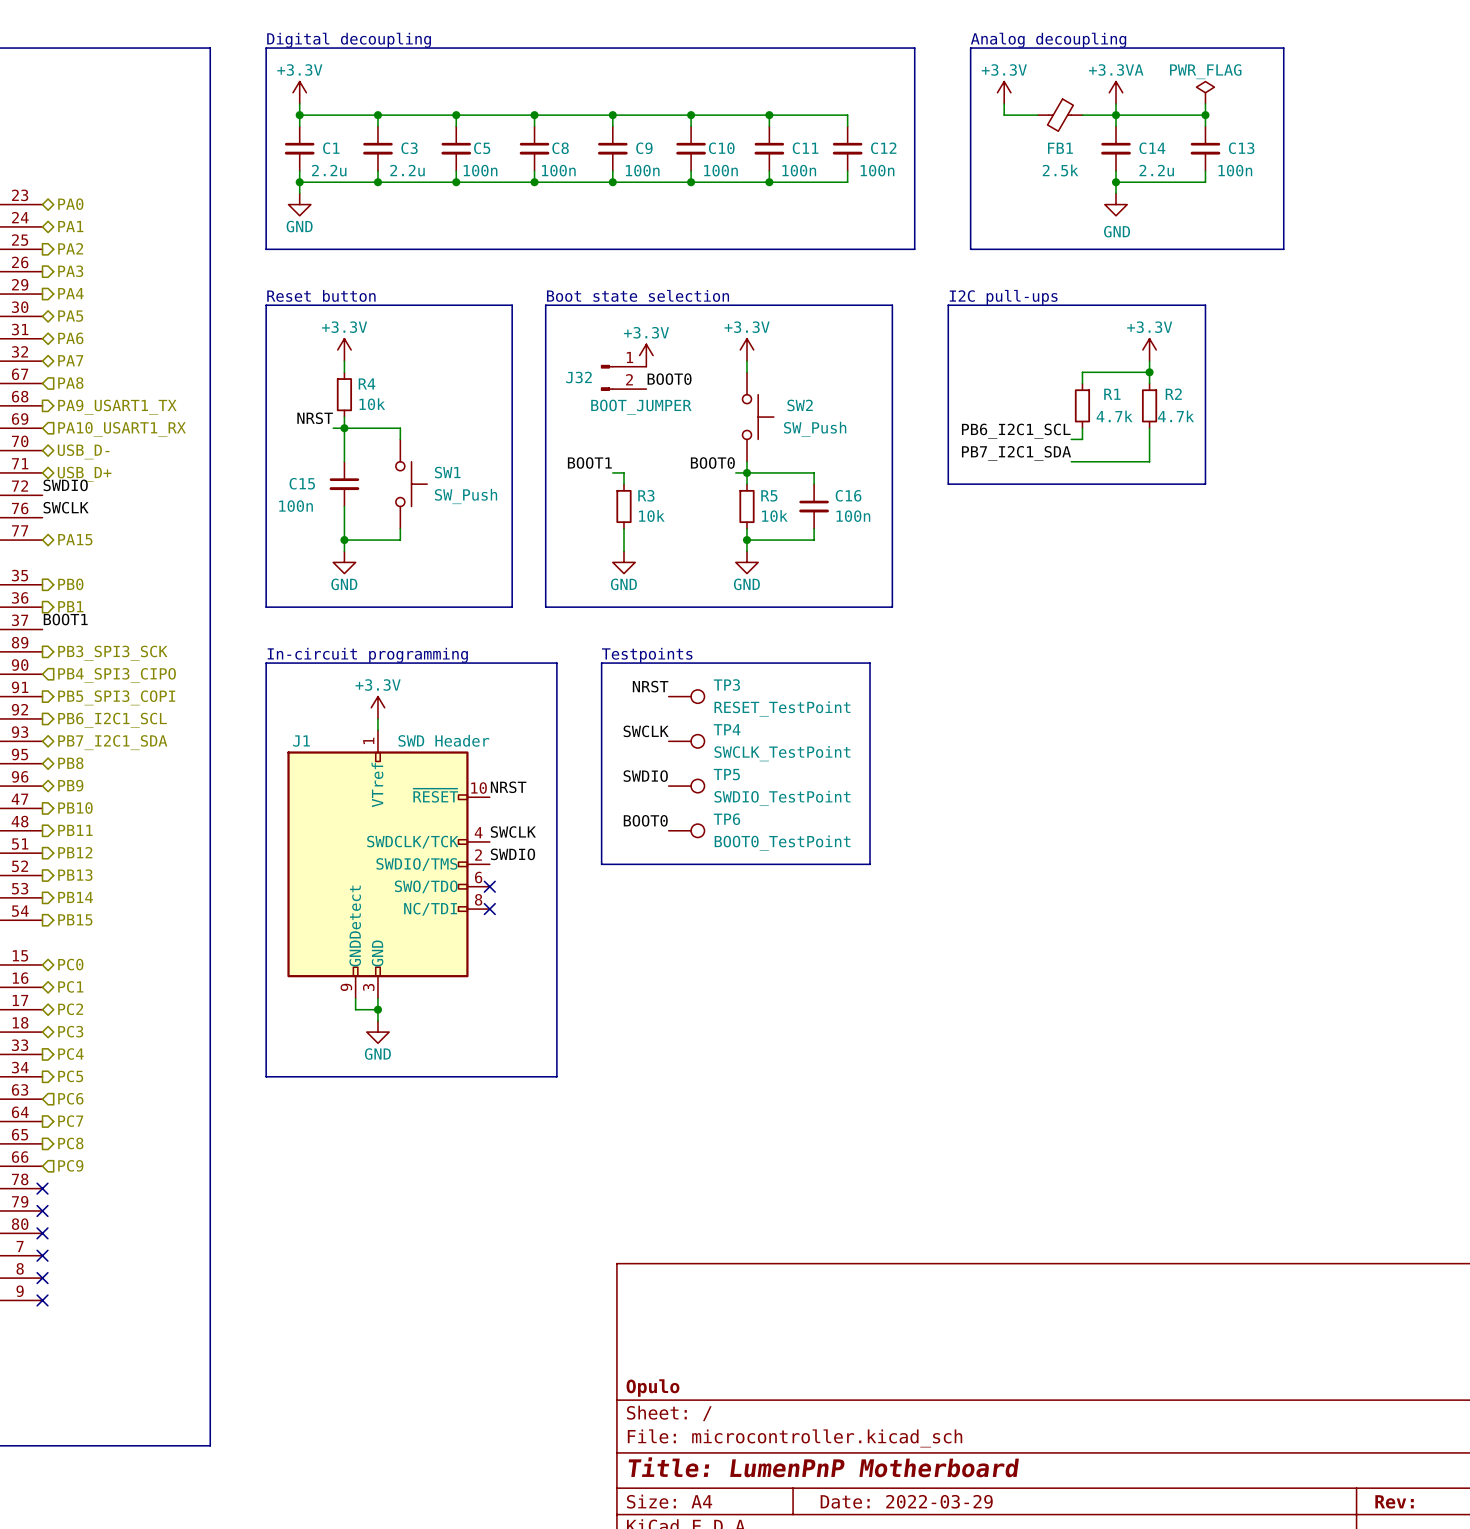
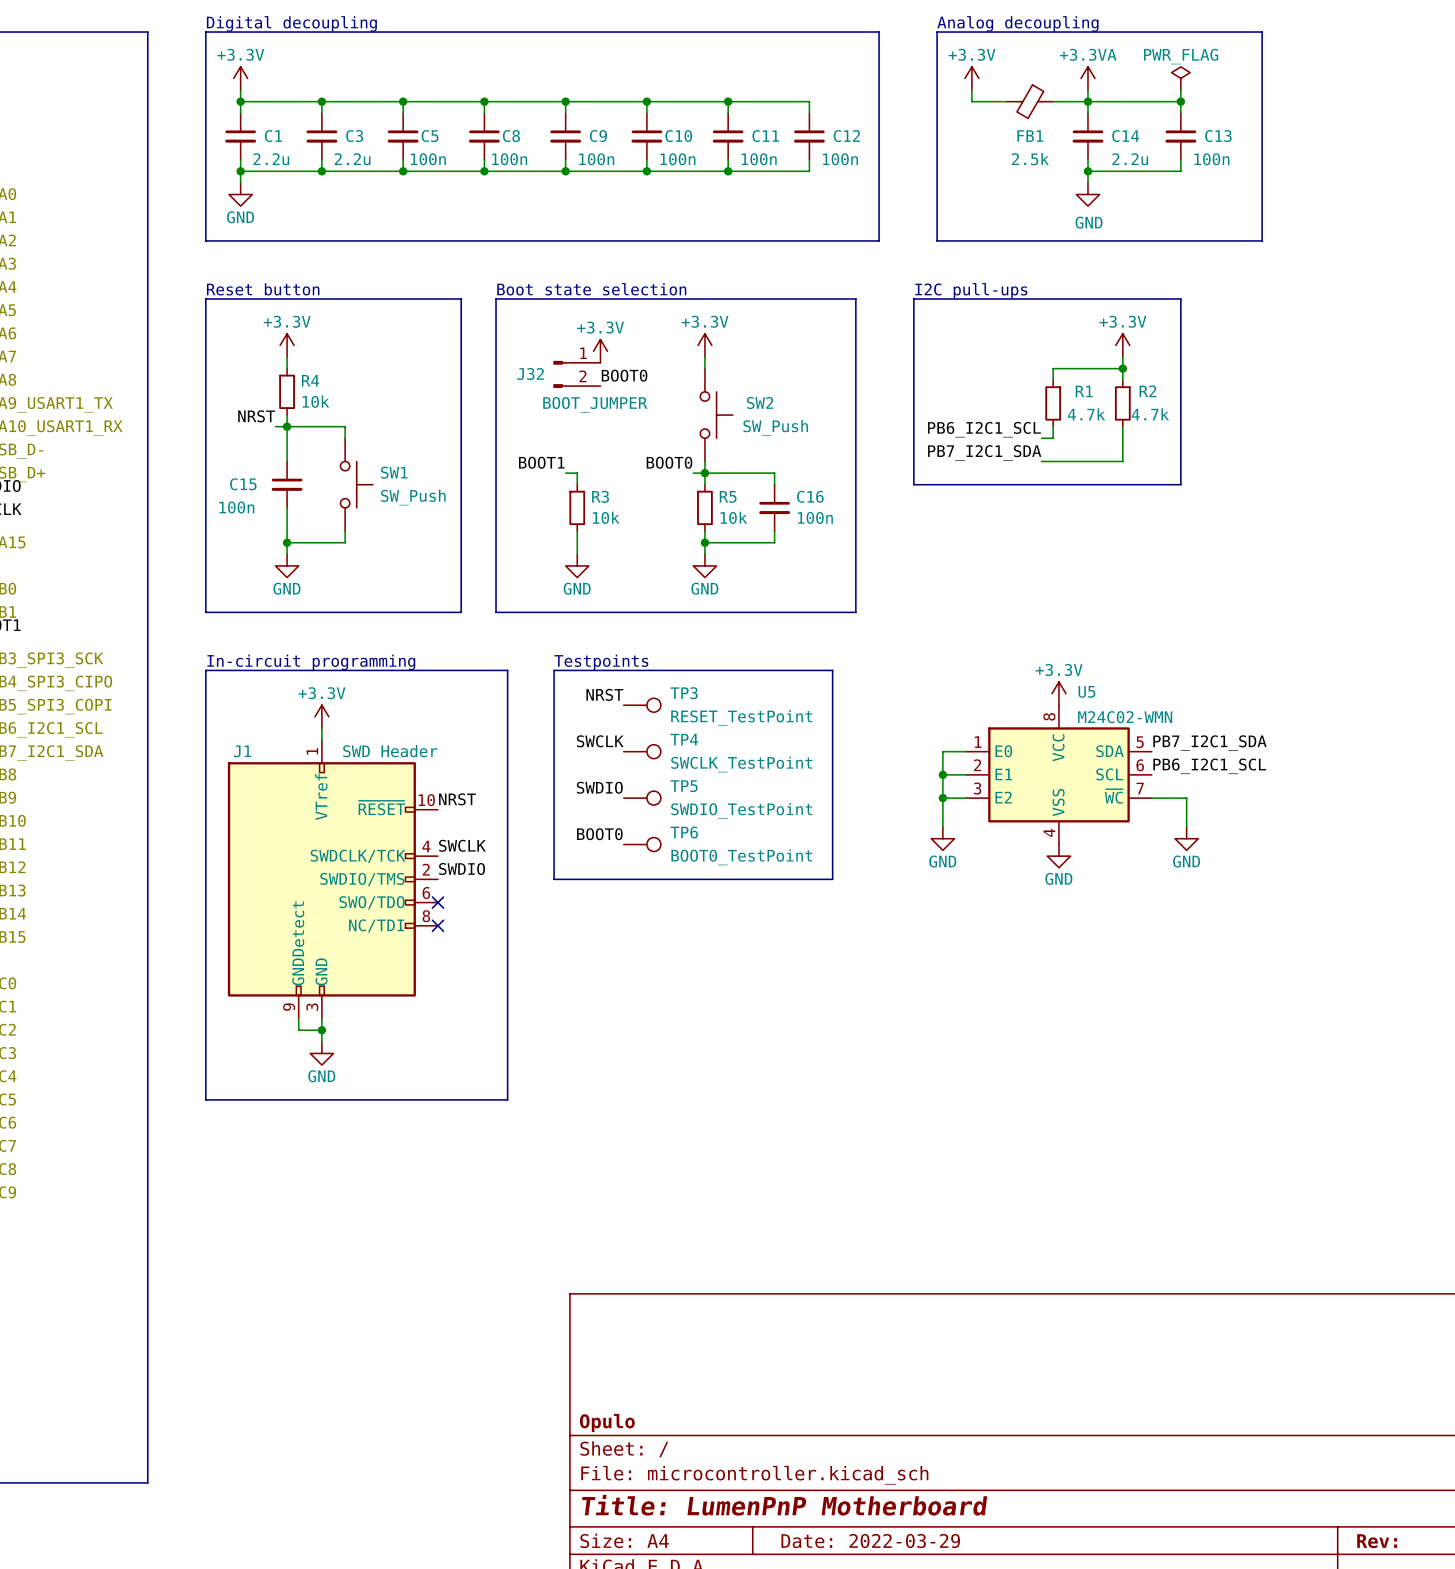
power symbol: none -> +3.3V (1058, 693)
label: none -> PB7_I2C1_SDA (1209, 743)
wire: none -> (966, 751) (942, 751) (942, 827)
label: none -> PB6_I2C1_SCL (1209, 766)
wire: none -> (942, 774) (966, 774)
junction: none -> (942, 774)
U5: none -> M24C02-WMN (1058, 774)
wire: none -> (942, 798) (966, 798)
junction: none -> (942, 798)
wire: none -> (1151, 798) (1186, 798) (1186, 827)
power symbol: none -> GND (942, 838)
power symbol: none -> GND (1186, 838)
power symbol: none -> GND (1058, 856)

